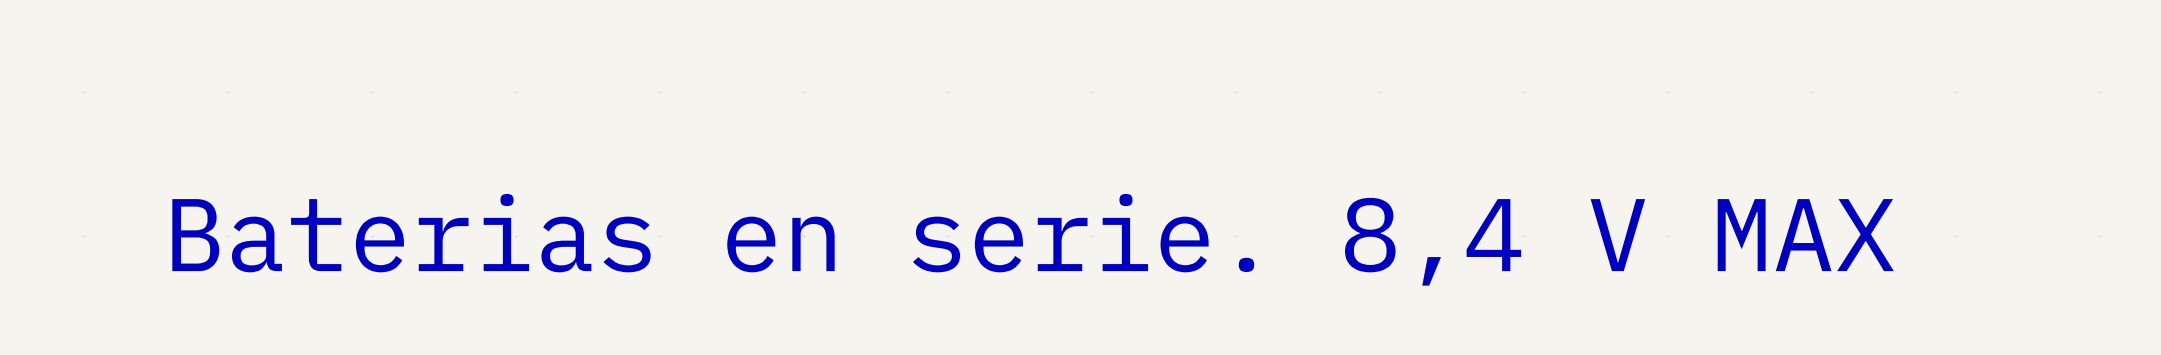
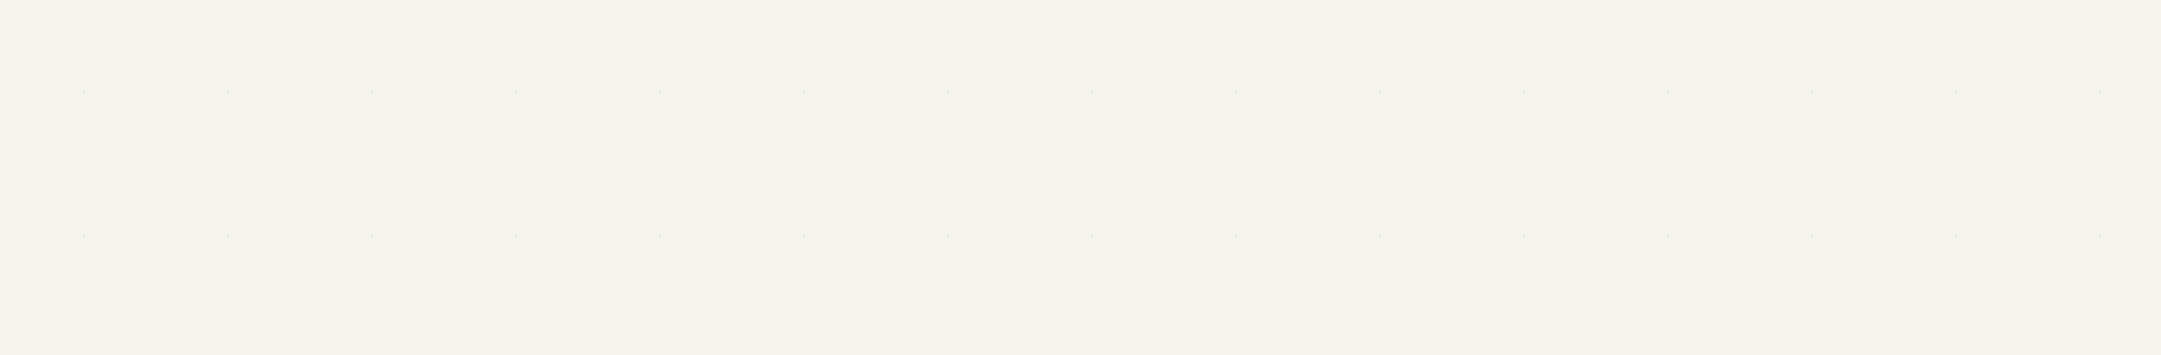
text: Baterias en serie. 8,4 V MAX (1033, 239) -> none

